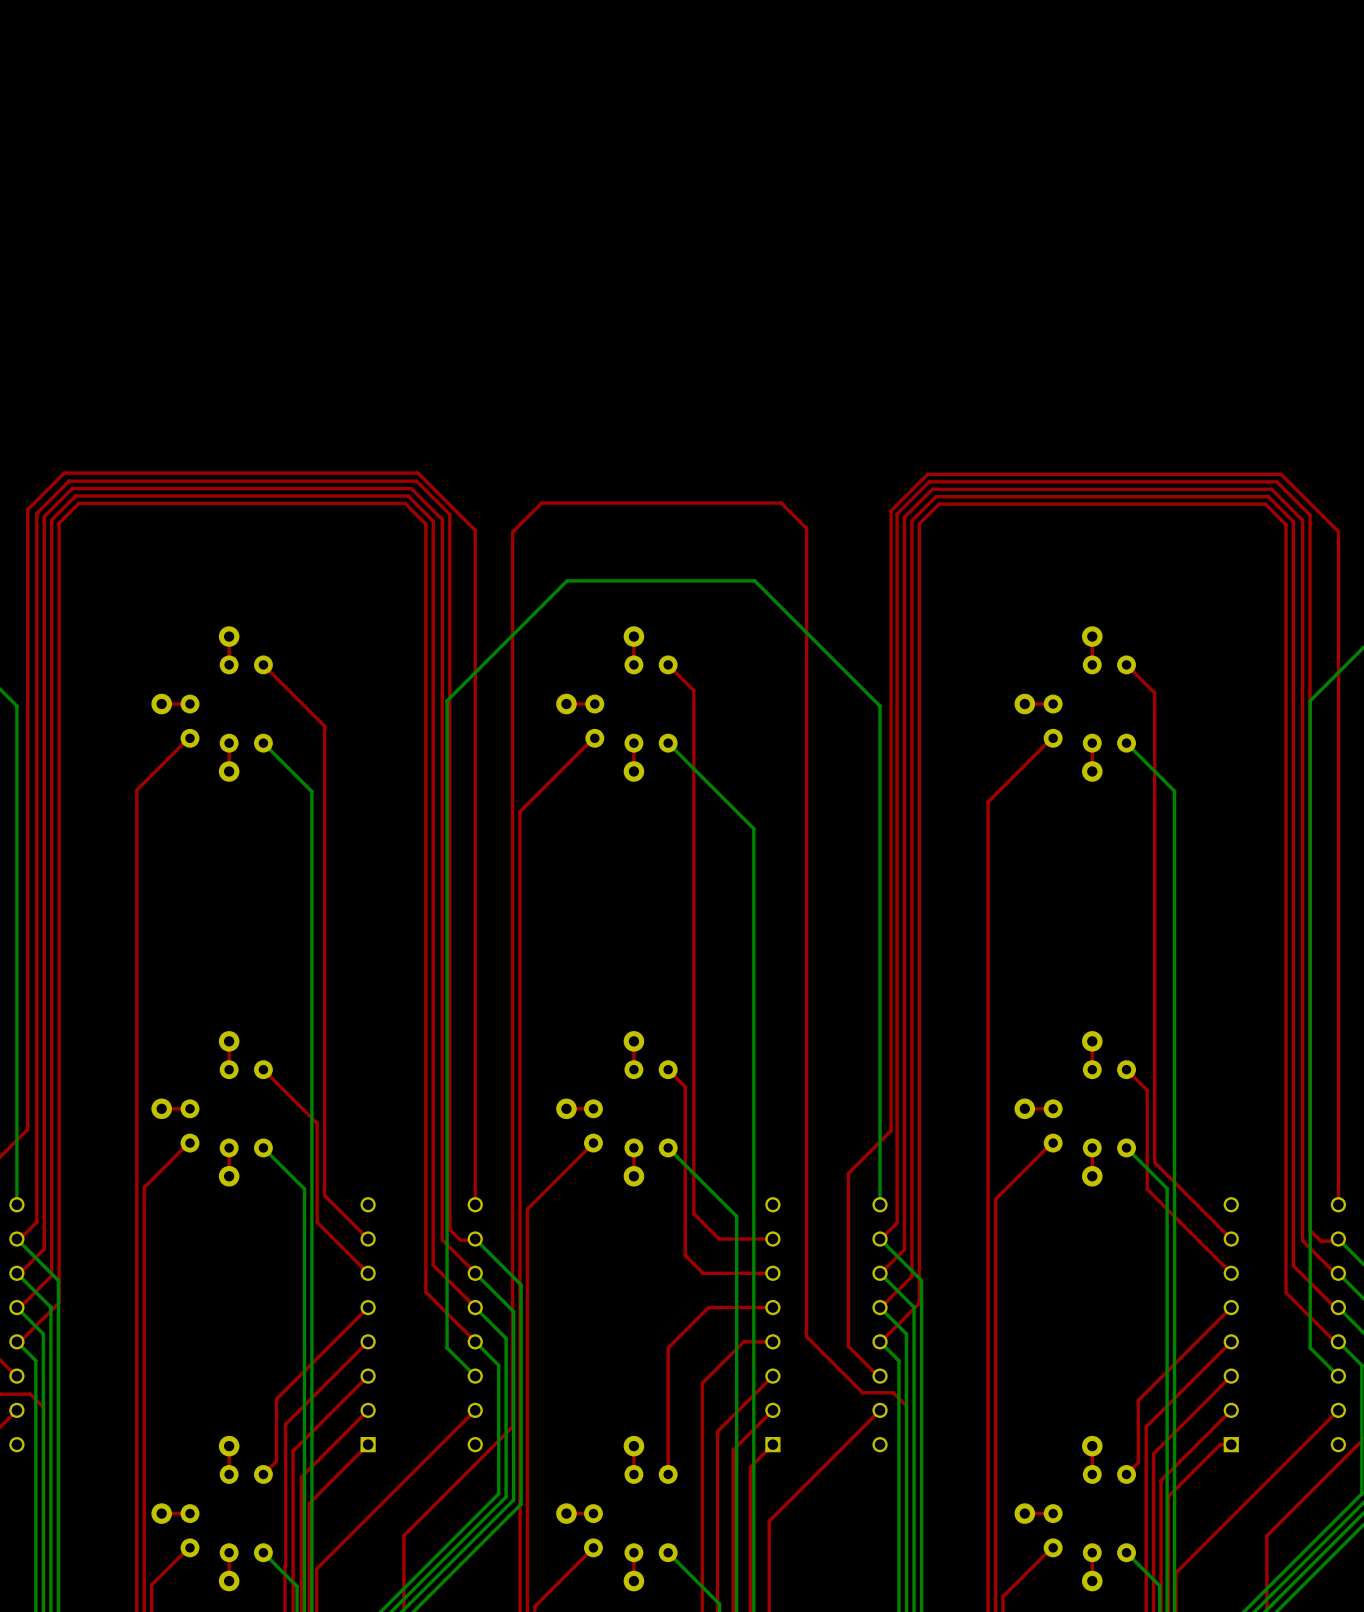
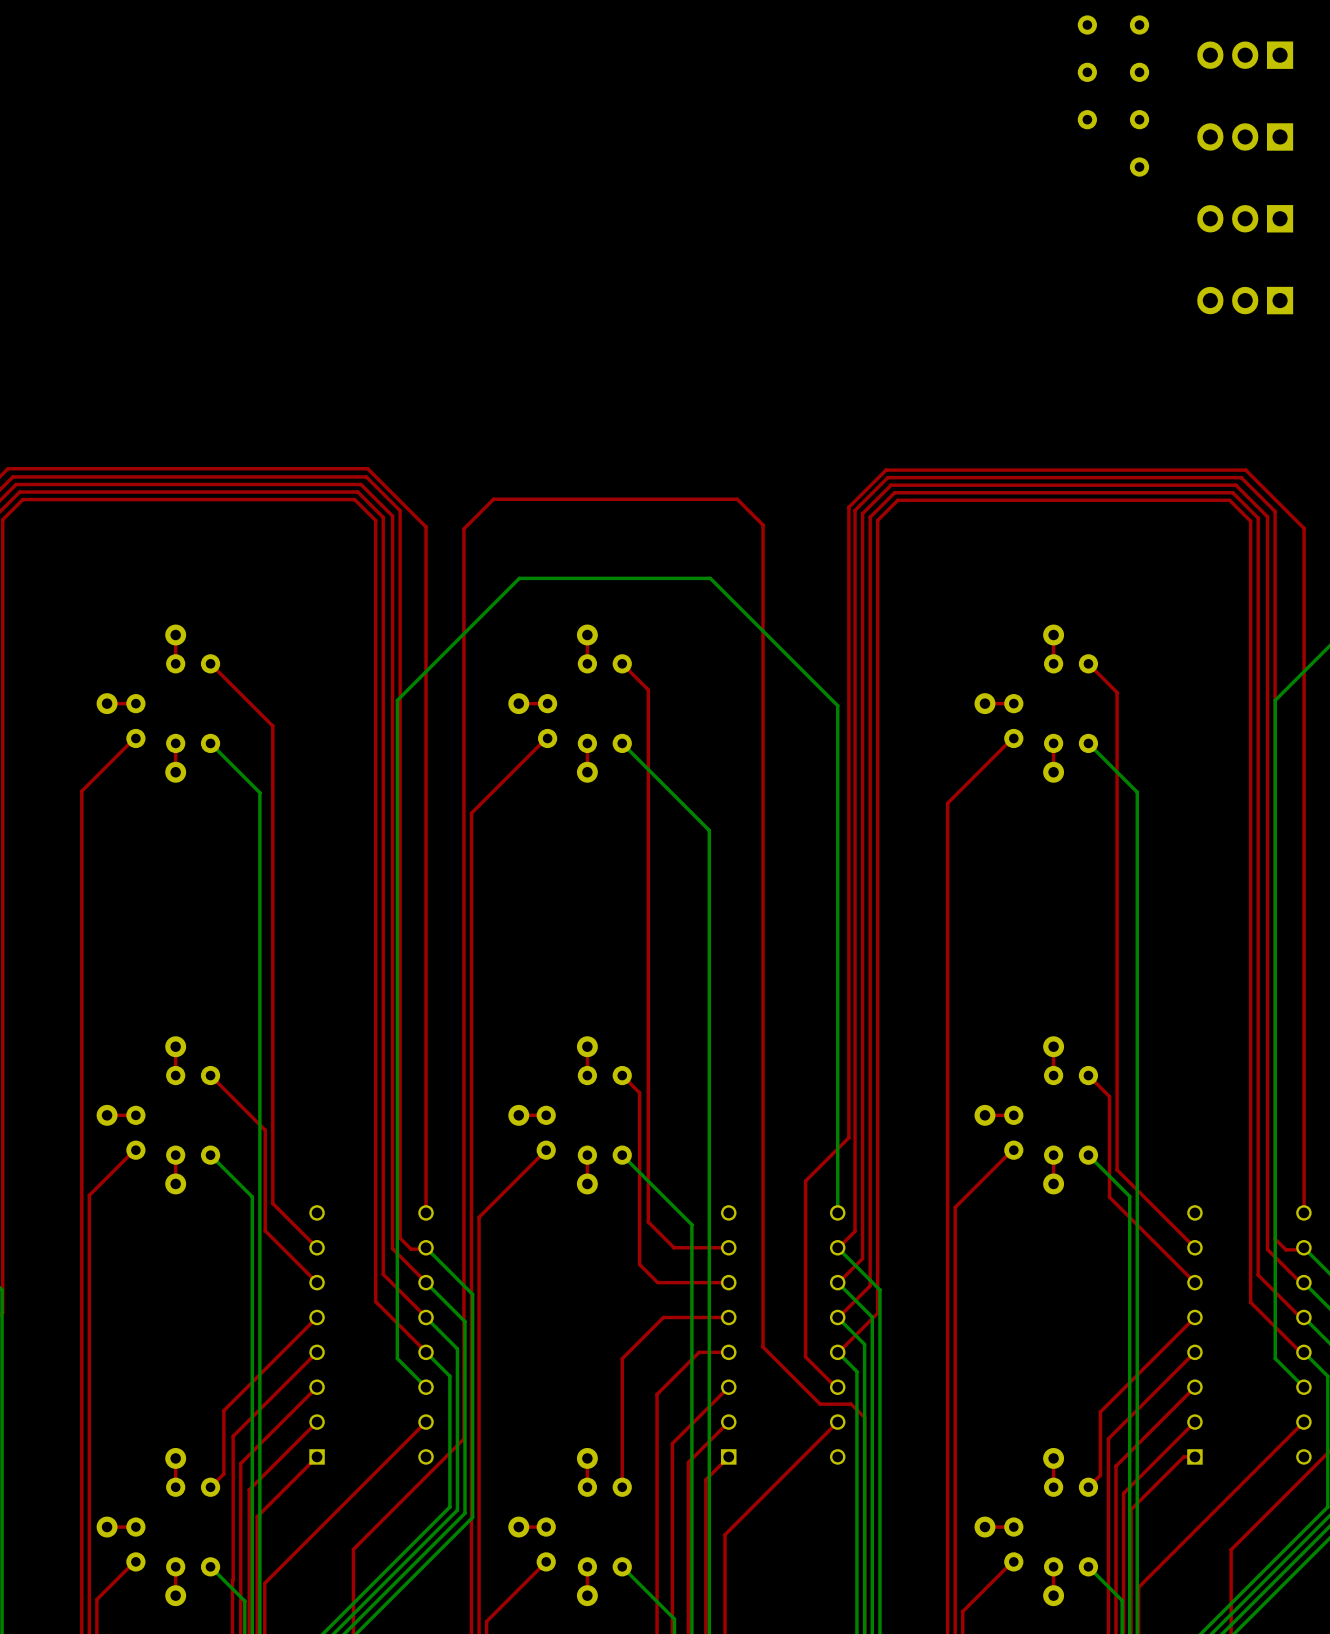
part: none -> (1087, 24)
part: none -> (1139, 24)
part: none -> (1245, 55)
part: none -> (1087, 72)
part: none -> (1139, 72)
part: none -> (1087, 119)
part: none -> (1139, 119)
part: none -> (1245, 136)
part: none -> (1139, 167)
part: none -> (1245, 218)
part: none -> (1245, 300)

